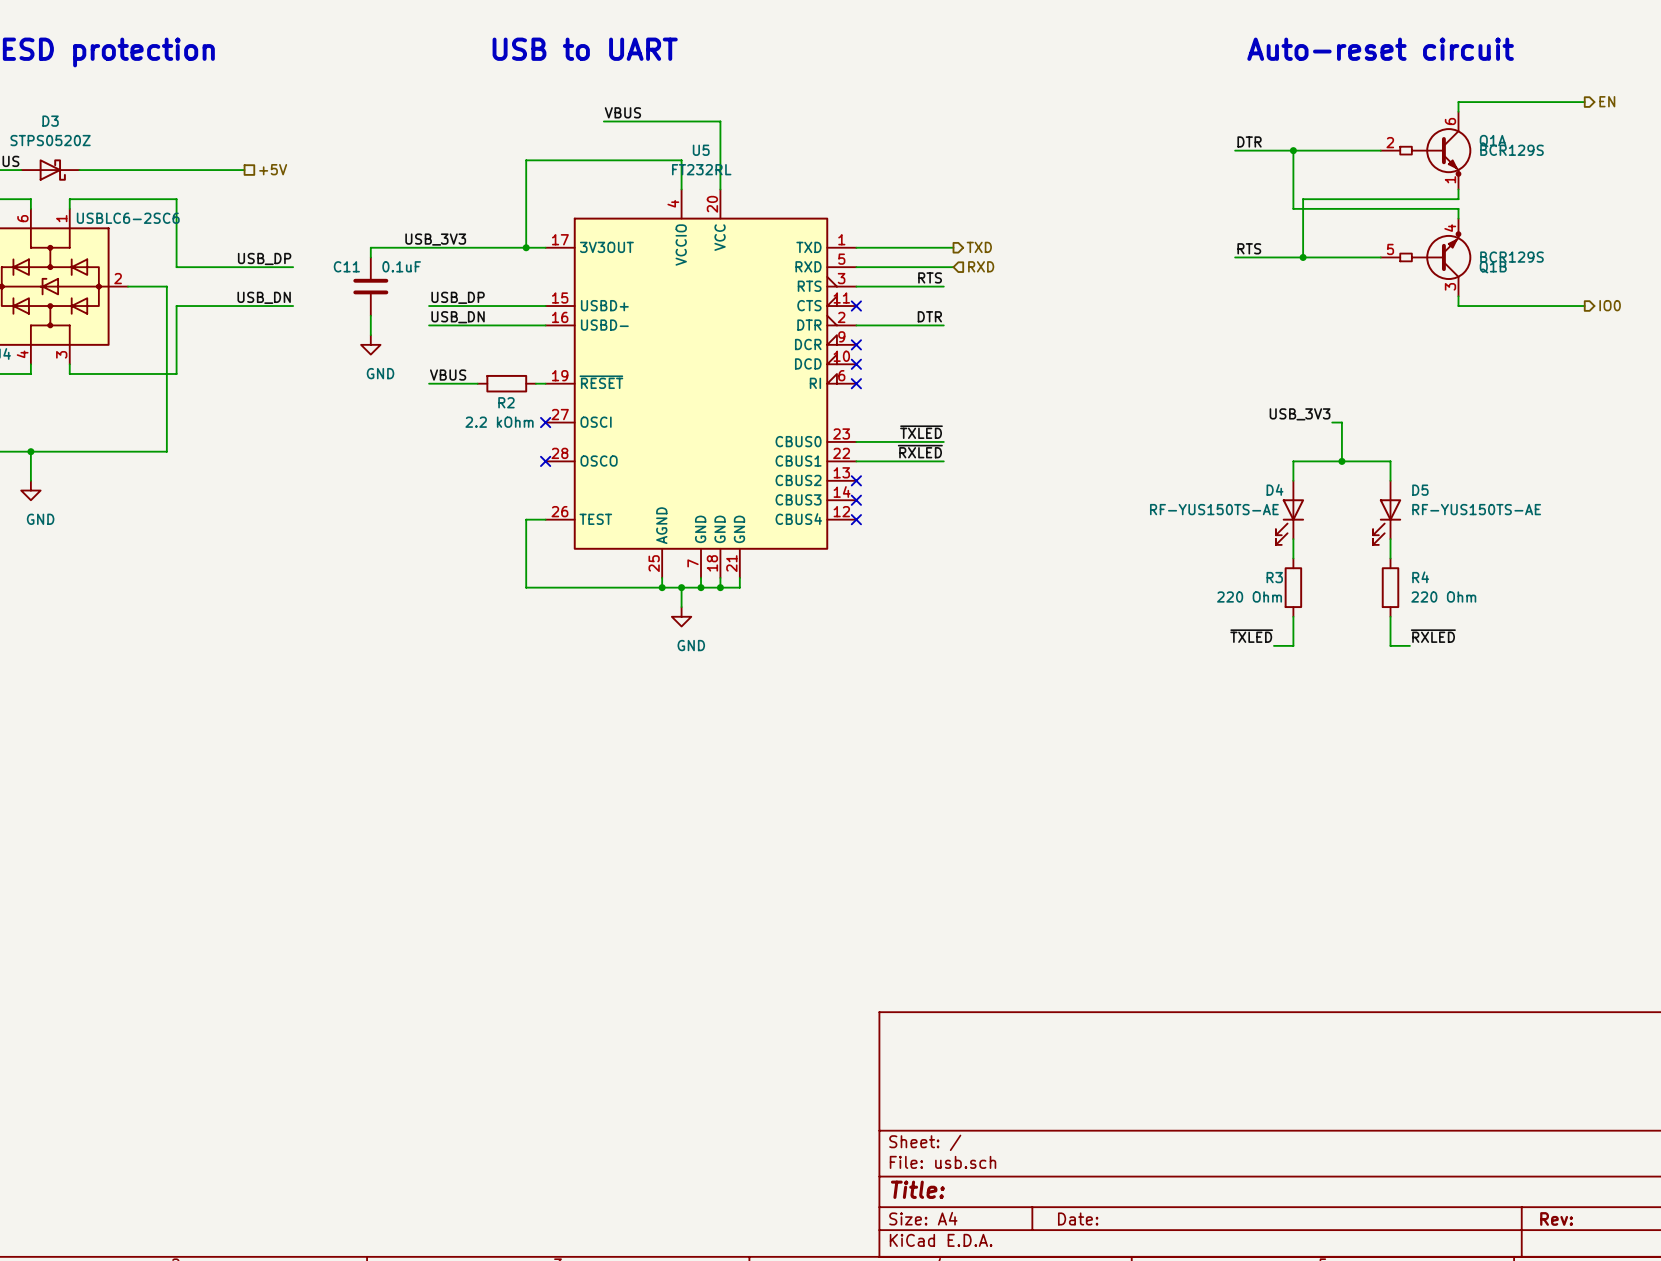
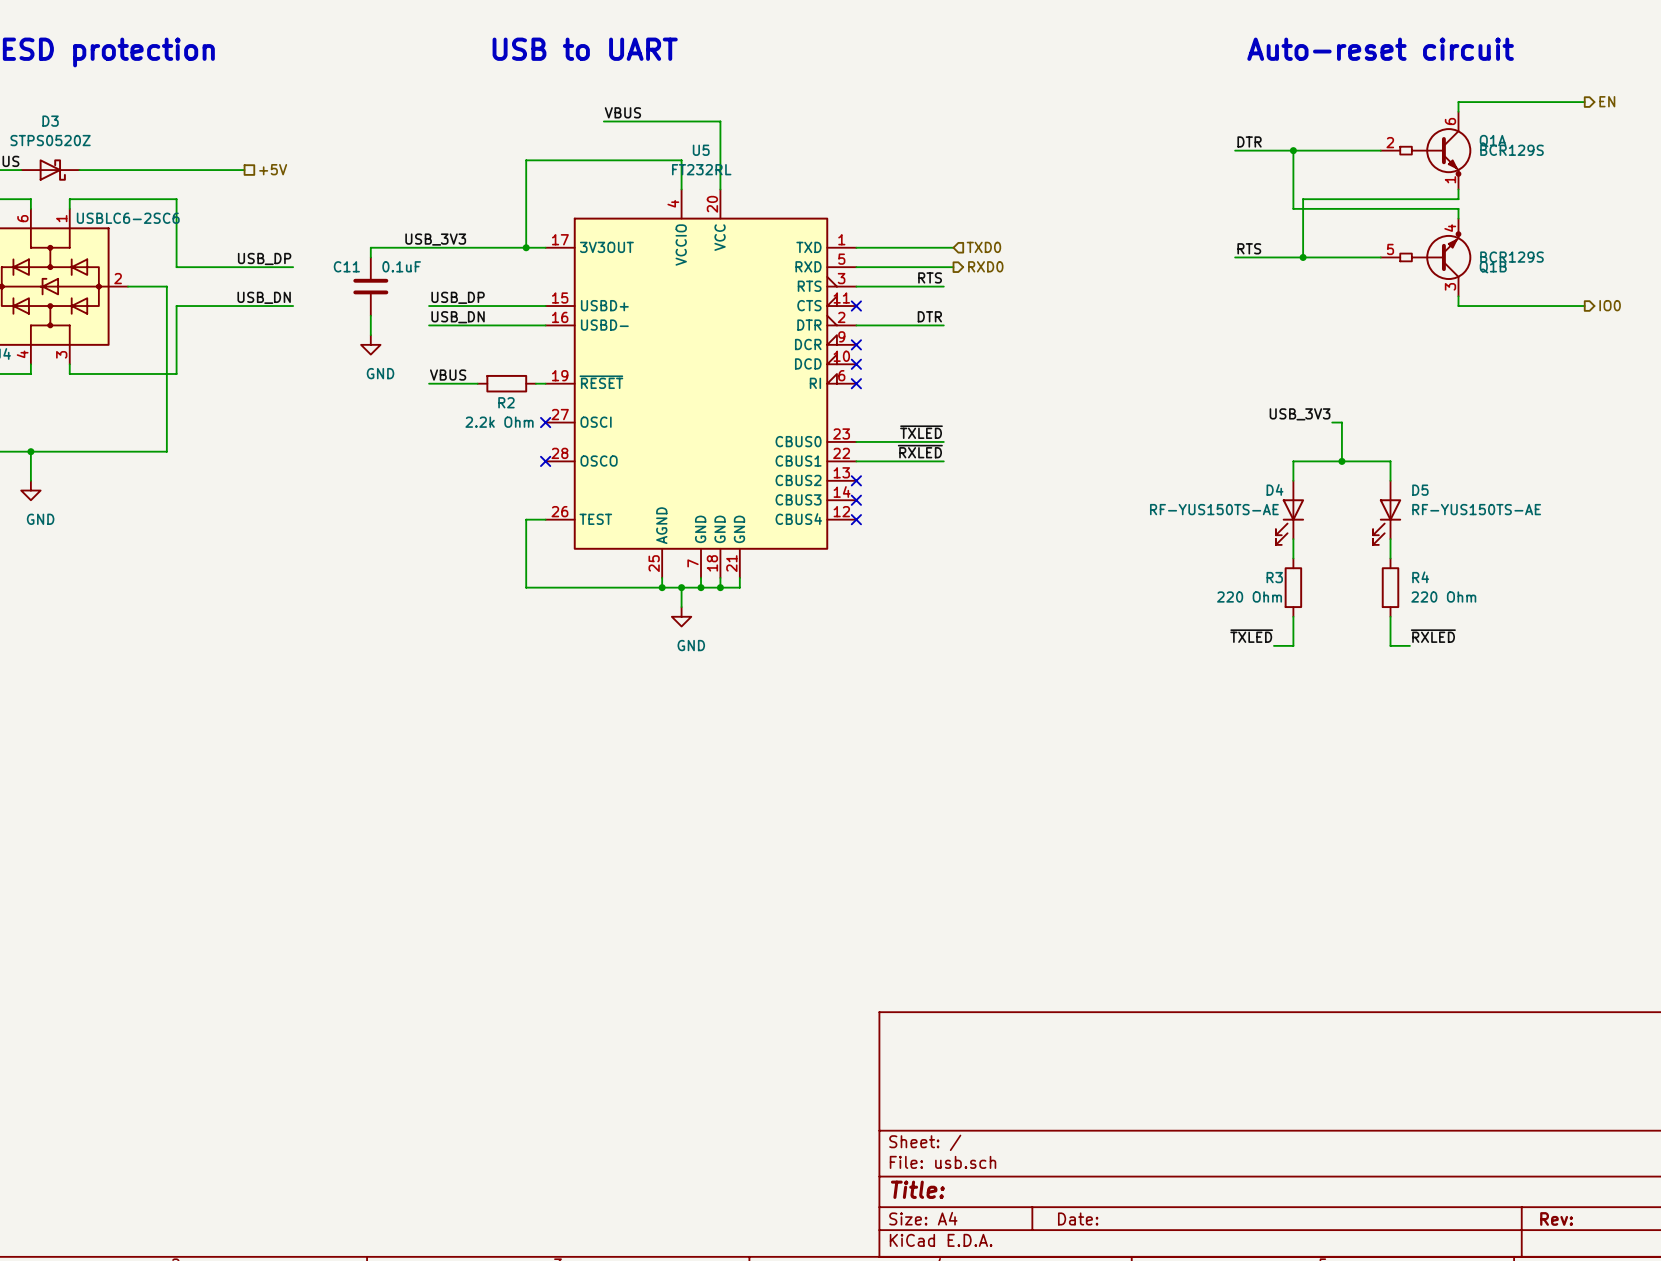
hierarchical label shape: output (979, 247) -> input (983, 247)
hierarchical label: TXD (979, 247) -> TXD0 (983, 247)
hierarchical label shape: input (981, 266) -> output (985, 266)
hierarchical label: RXD (981, 266) -> RXD0 (985, 266)
R2 value: 2.2 kOhm (499, 422) -> 2.2k Ohm (499, 422)

